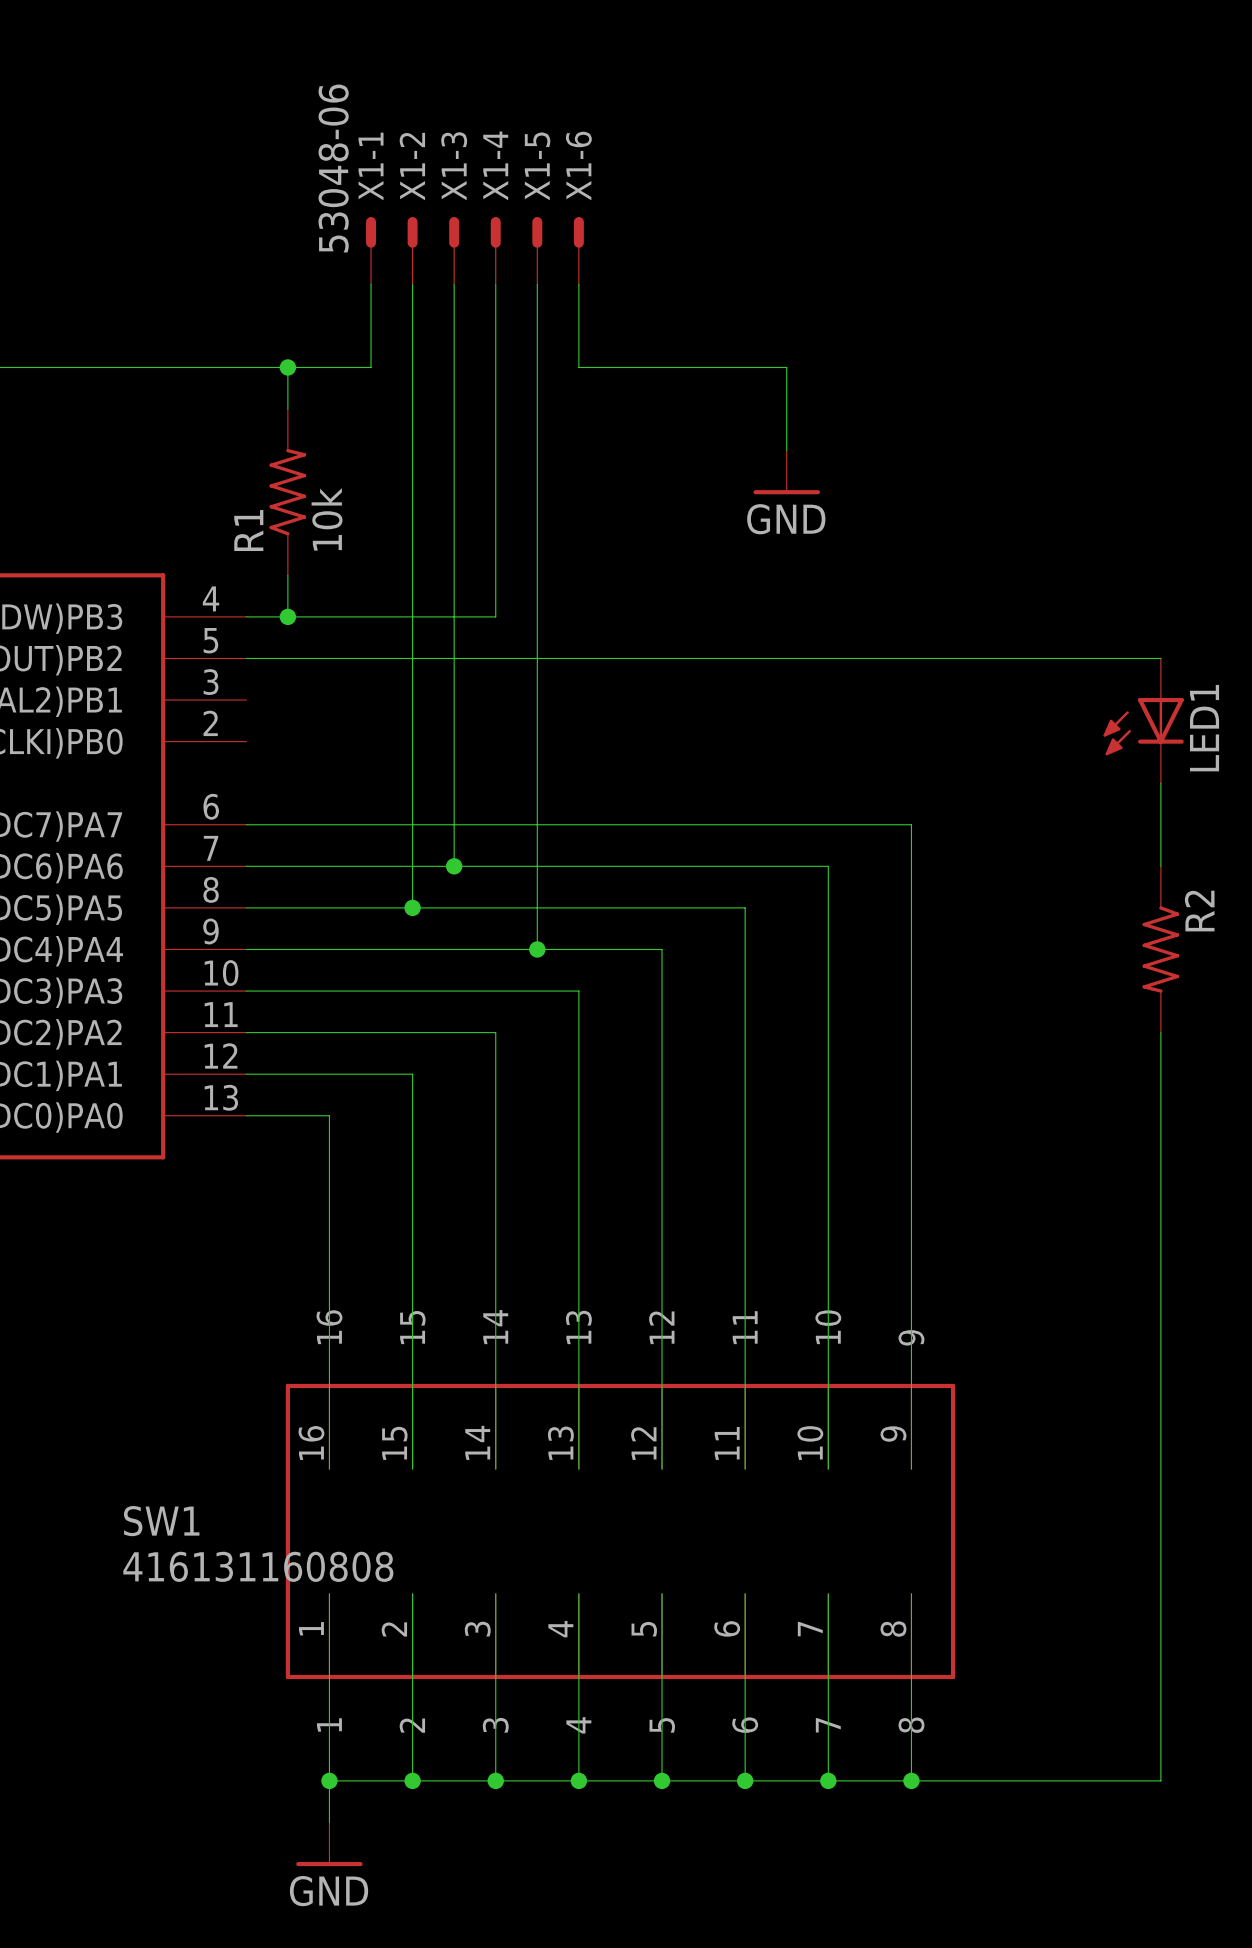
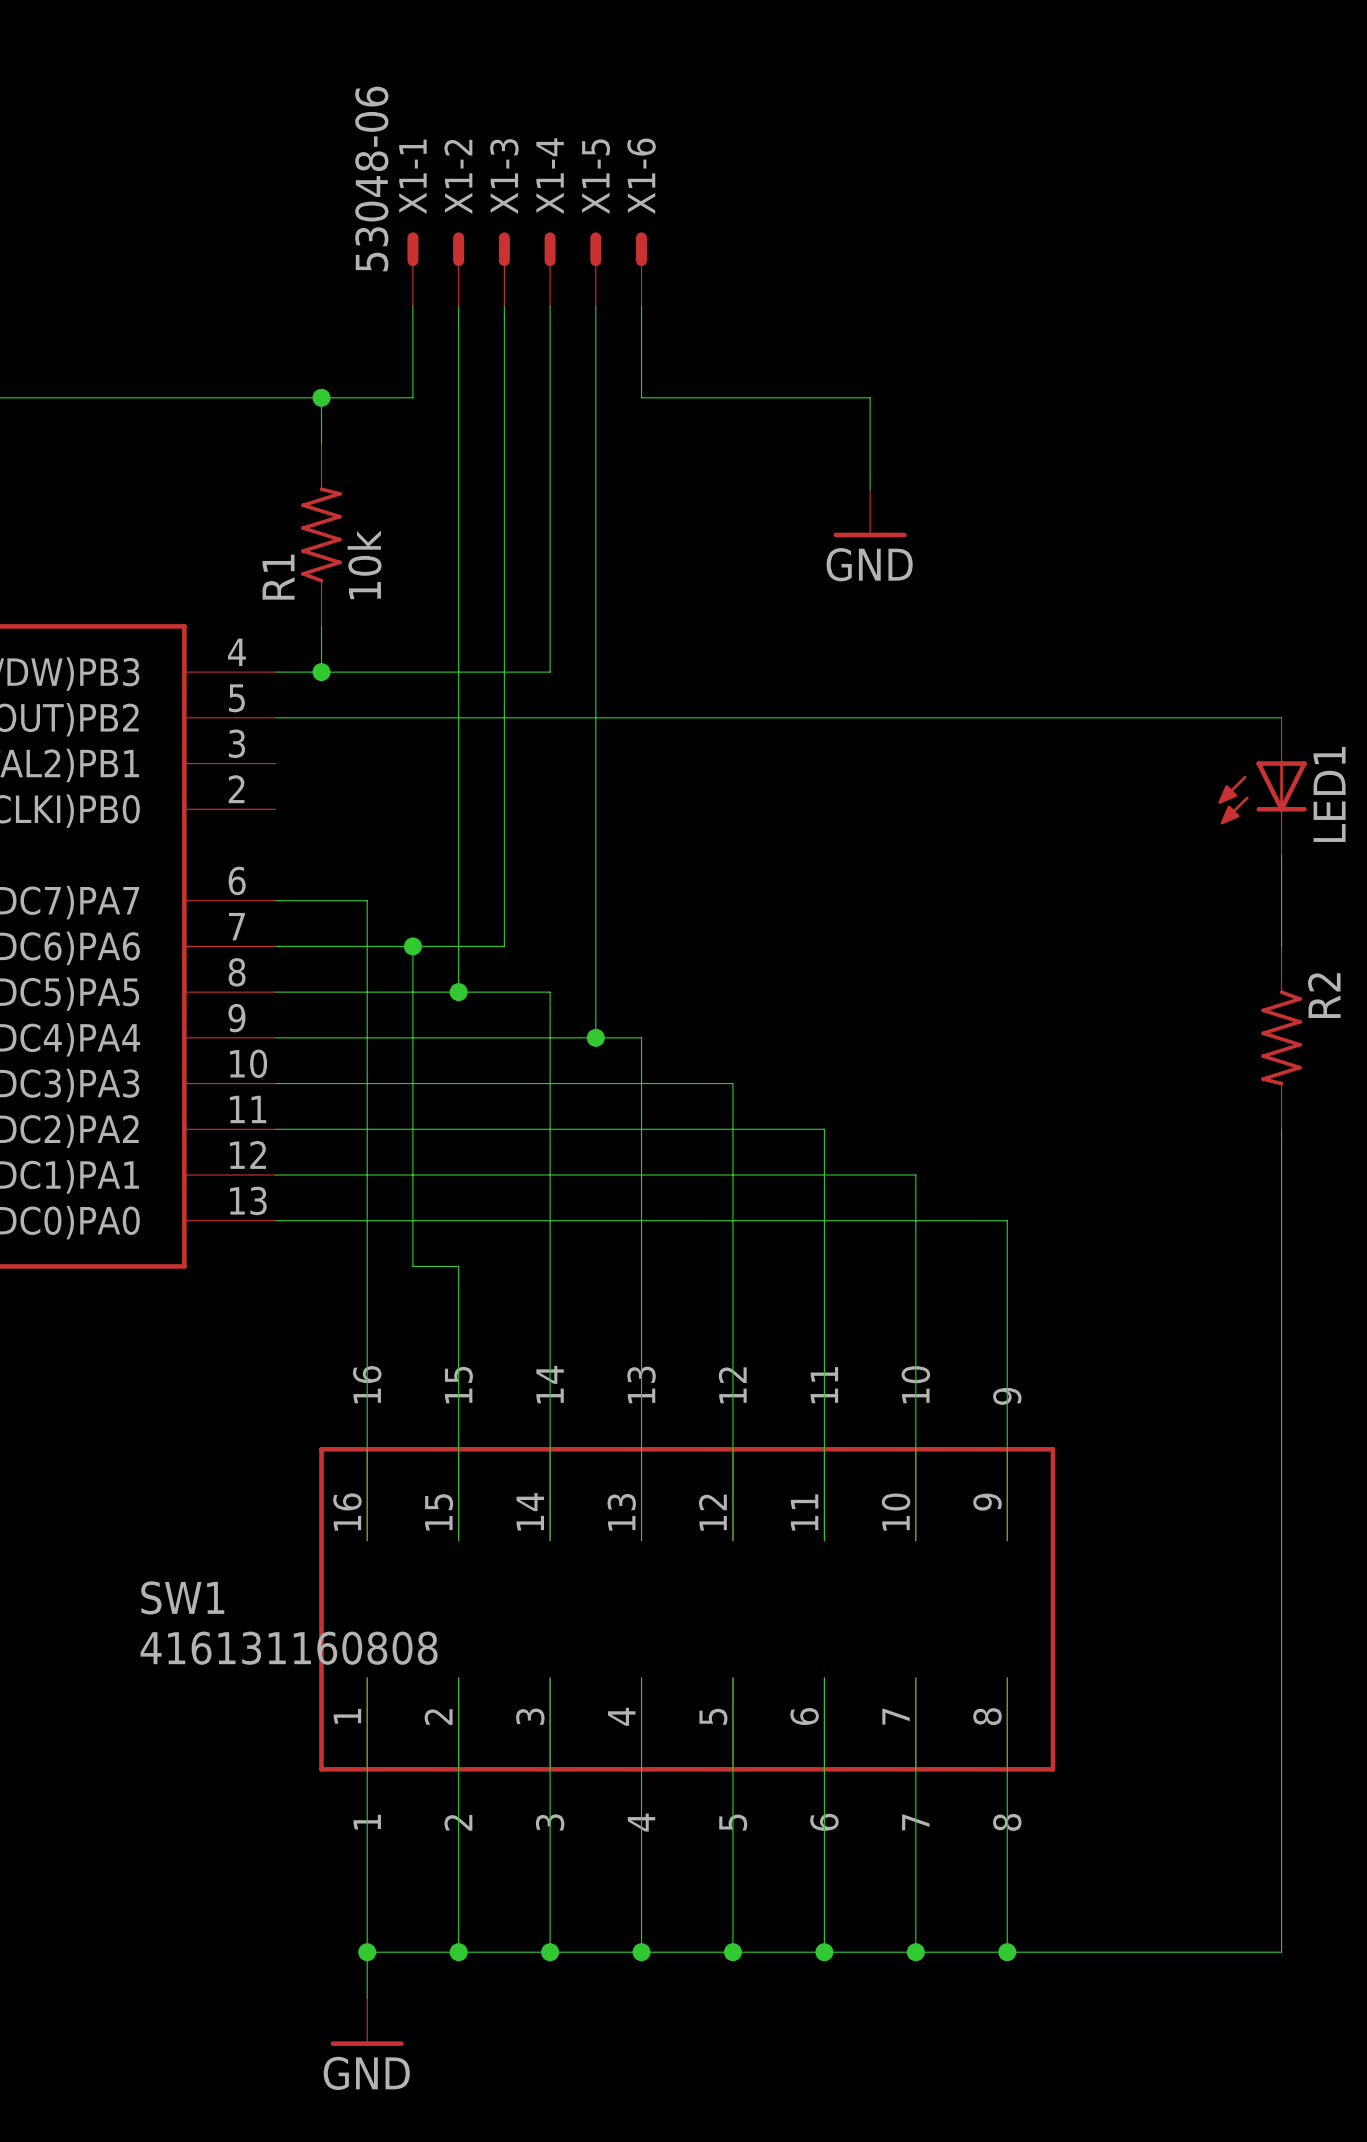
wire: (329, 824) (911, 824) (911, 1115) -> (367, 900) (367, 1220) (1007, 1220)
wire: (454, 866) (828, 866) (828, 1074) -> (458, 1175) (915, 1175)
junction position: (454, 866) -> (412, 946)
wire: (495, 907) (745, 907) (745, 1032) -> (550, 992) (550, 1129) (824, 1129)
wire: (578, 949) (662, 949) (662, 991) -> (641, 1037) (641, 1083) (732, 1083)
wire: (412, 1074) (412, 1157) -> (412, 946) (412, 1266) (458, 1266)
wire: (329, 1406) (329, 1469) -> (367, 1677) (367, 1746)
wire: (412, 1406) (412, 1469) -> (458, 1677) (458, 1746)
wire: (495, 1406) (495, 1469) -> (550, 1677) (550, 1746)
wire: (578, 1406) (578, 1469) -> (641, 1677) (641, 1746)
wire: (662, 1406) (662, 1469) -> (732, 1677) (732, 1746)
wire: (745, 1406) (745, 1469) -> (824, 1677) (824, 1746)
wire: (828, 1406) (828, 1469) -> (915, 1677) (915, 1746)
wire: (911, 1406) (911, 1469) -> (1007, 1677) (1007, 1746)
SW1 position: (620, 1531) -> (687, 1609)

